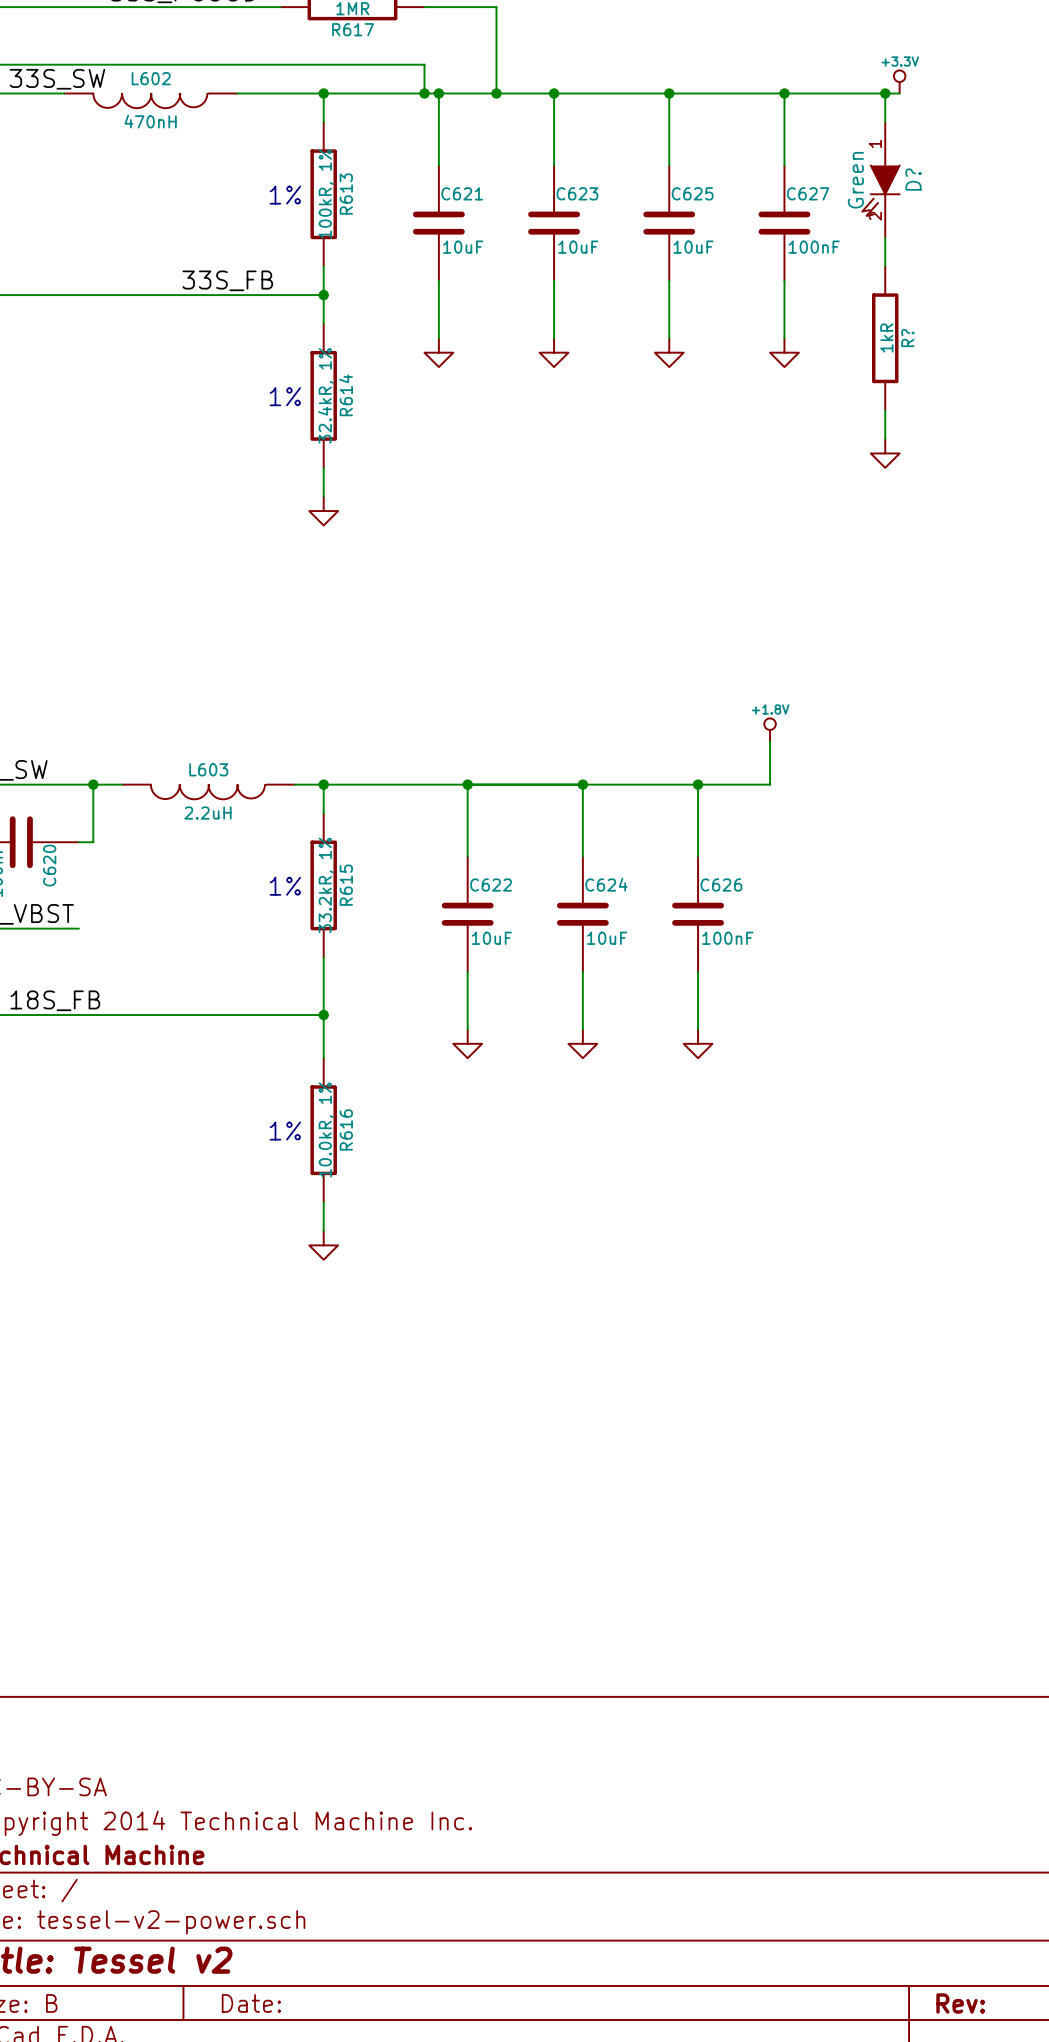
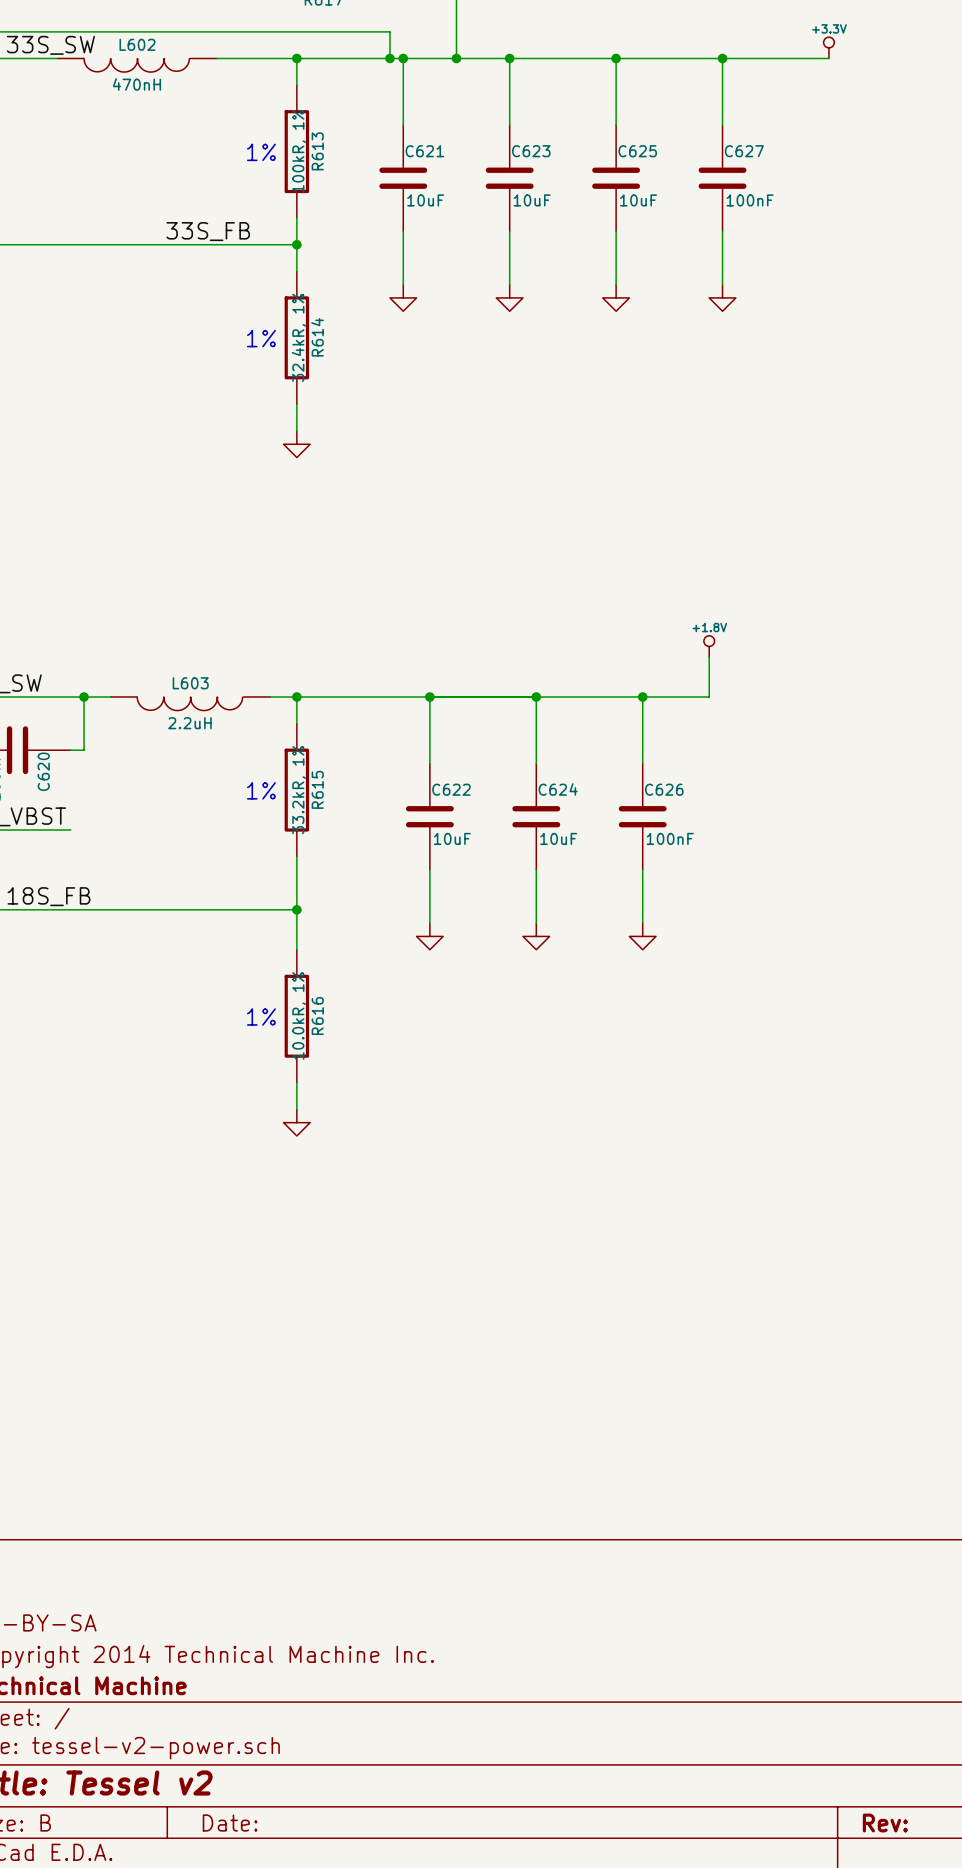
wire: (885, 93) (885, 122) -> none
junction: (885, 93) -> none
D?: Green (880, 179) -> none
wire: (885, 237) (885, 266) -> none
R?: 1kR (885, 338) -> none
wire: (885, 410) (885, 439) -> none
power symbol: (885, 453) -> none

